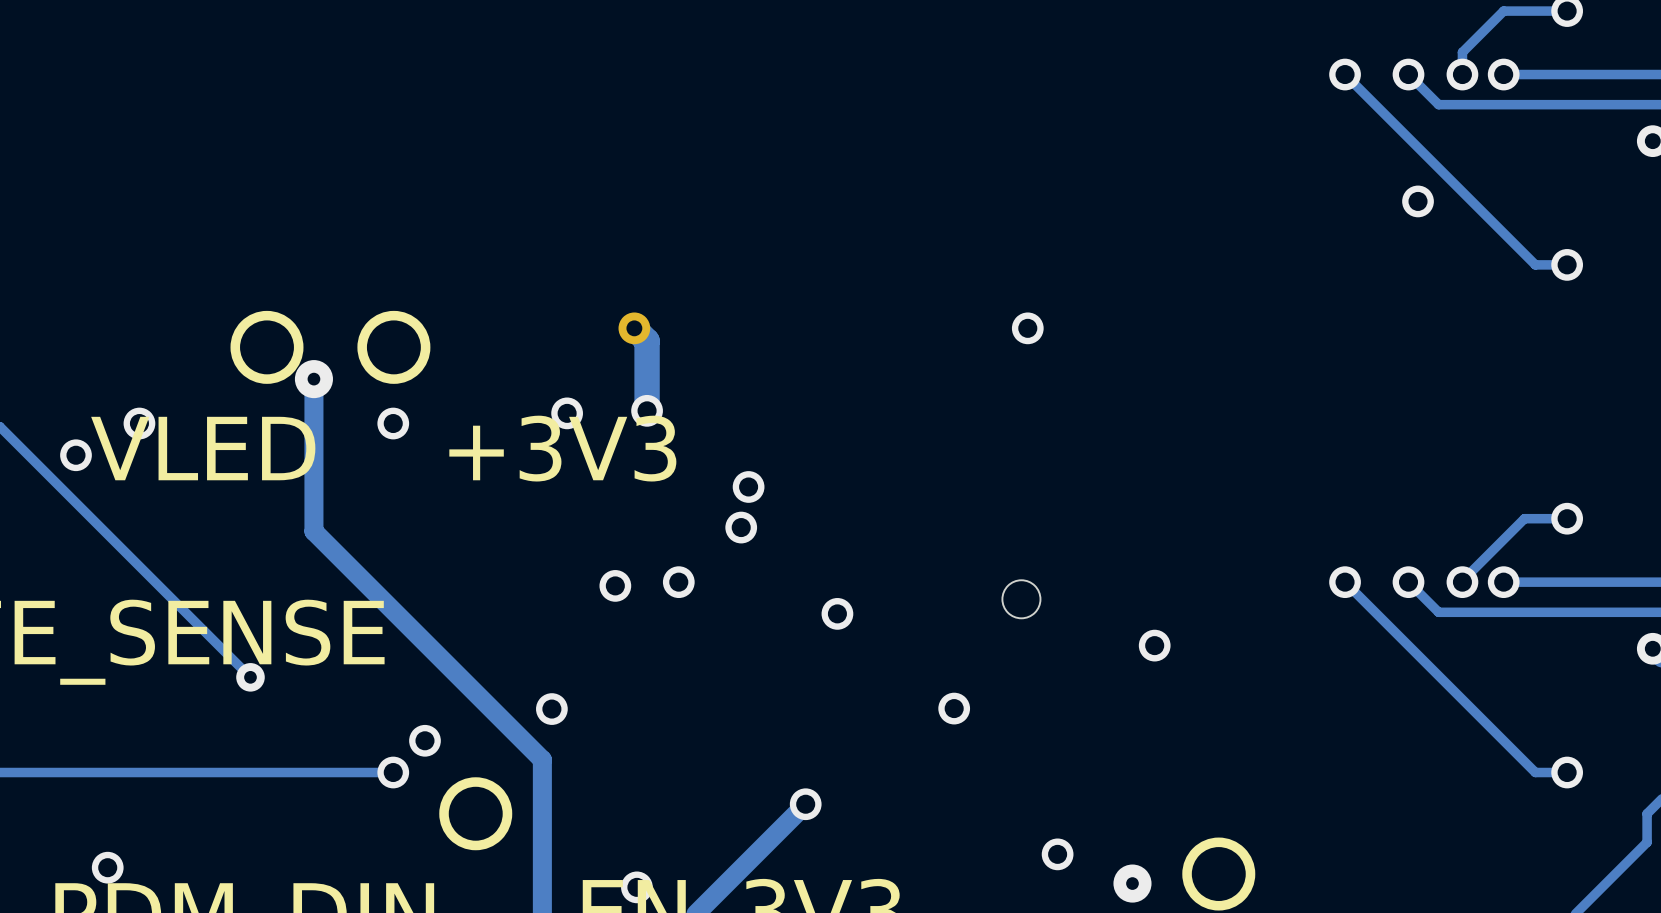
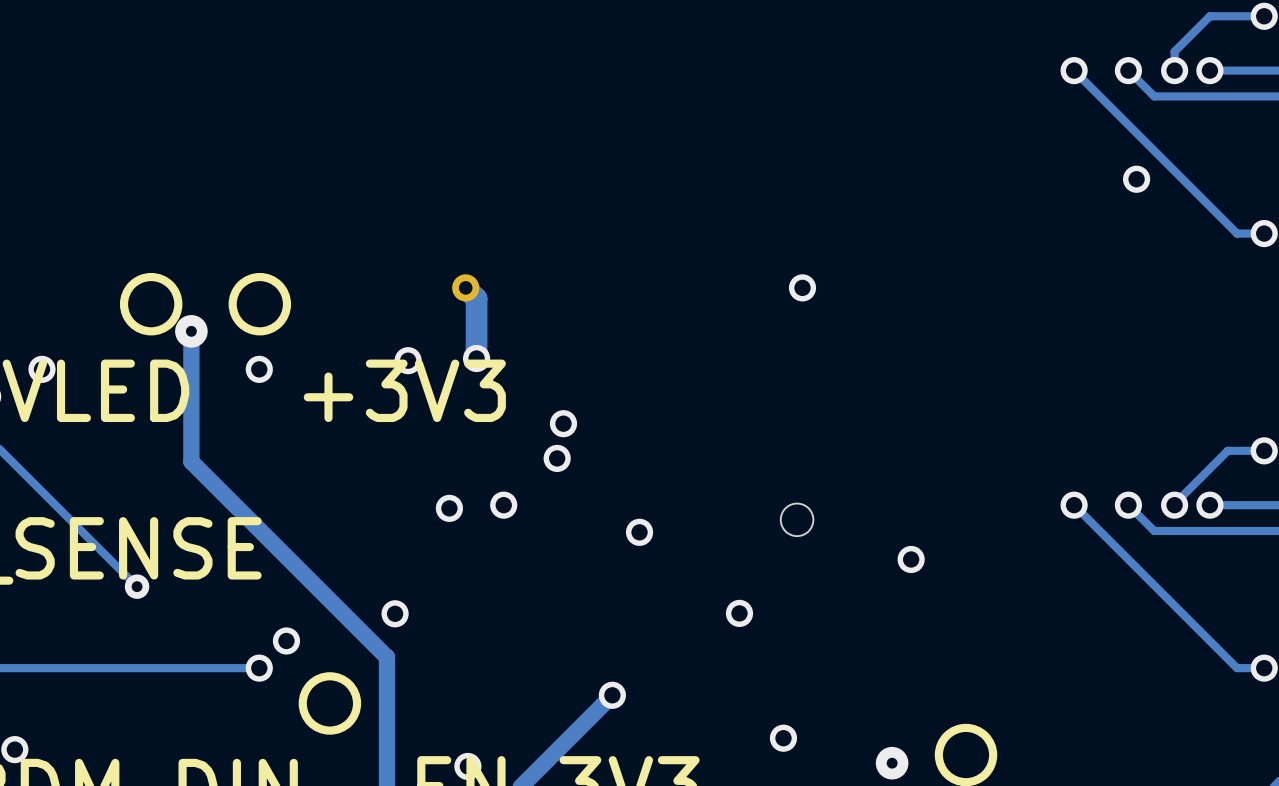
via position: (1057, 854) -> (783, 738)

